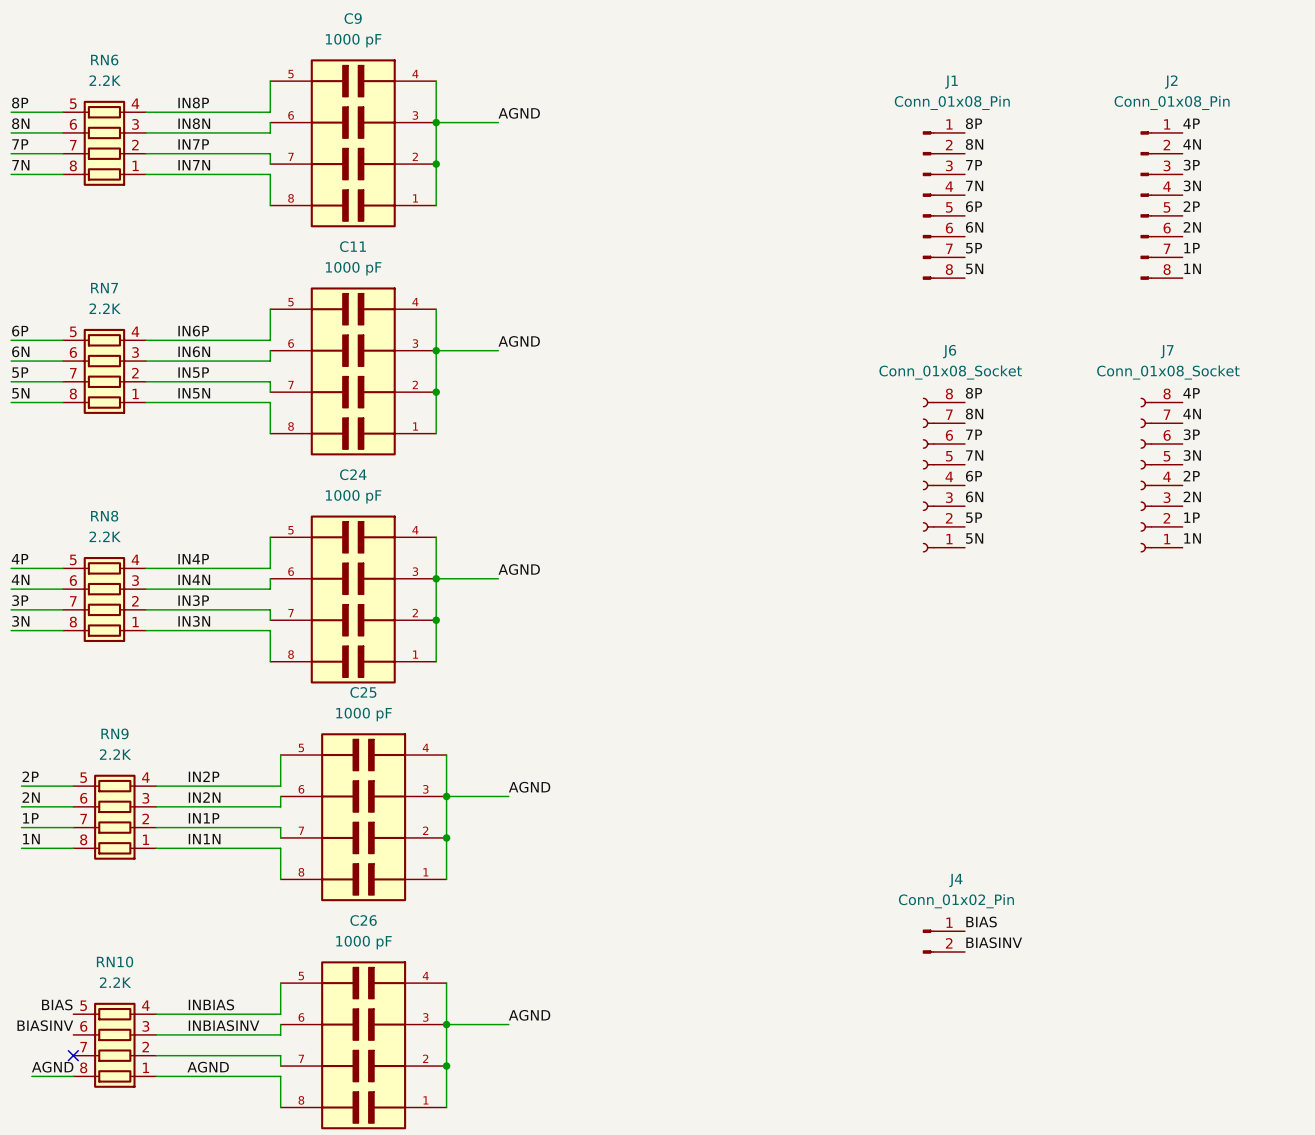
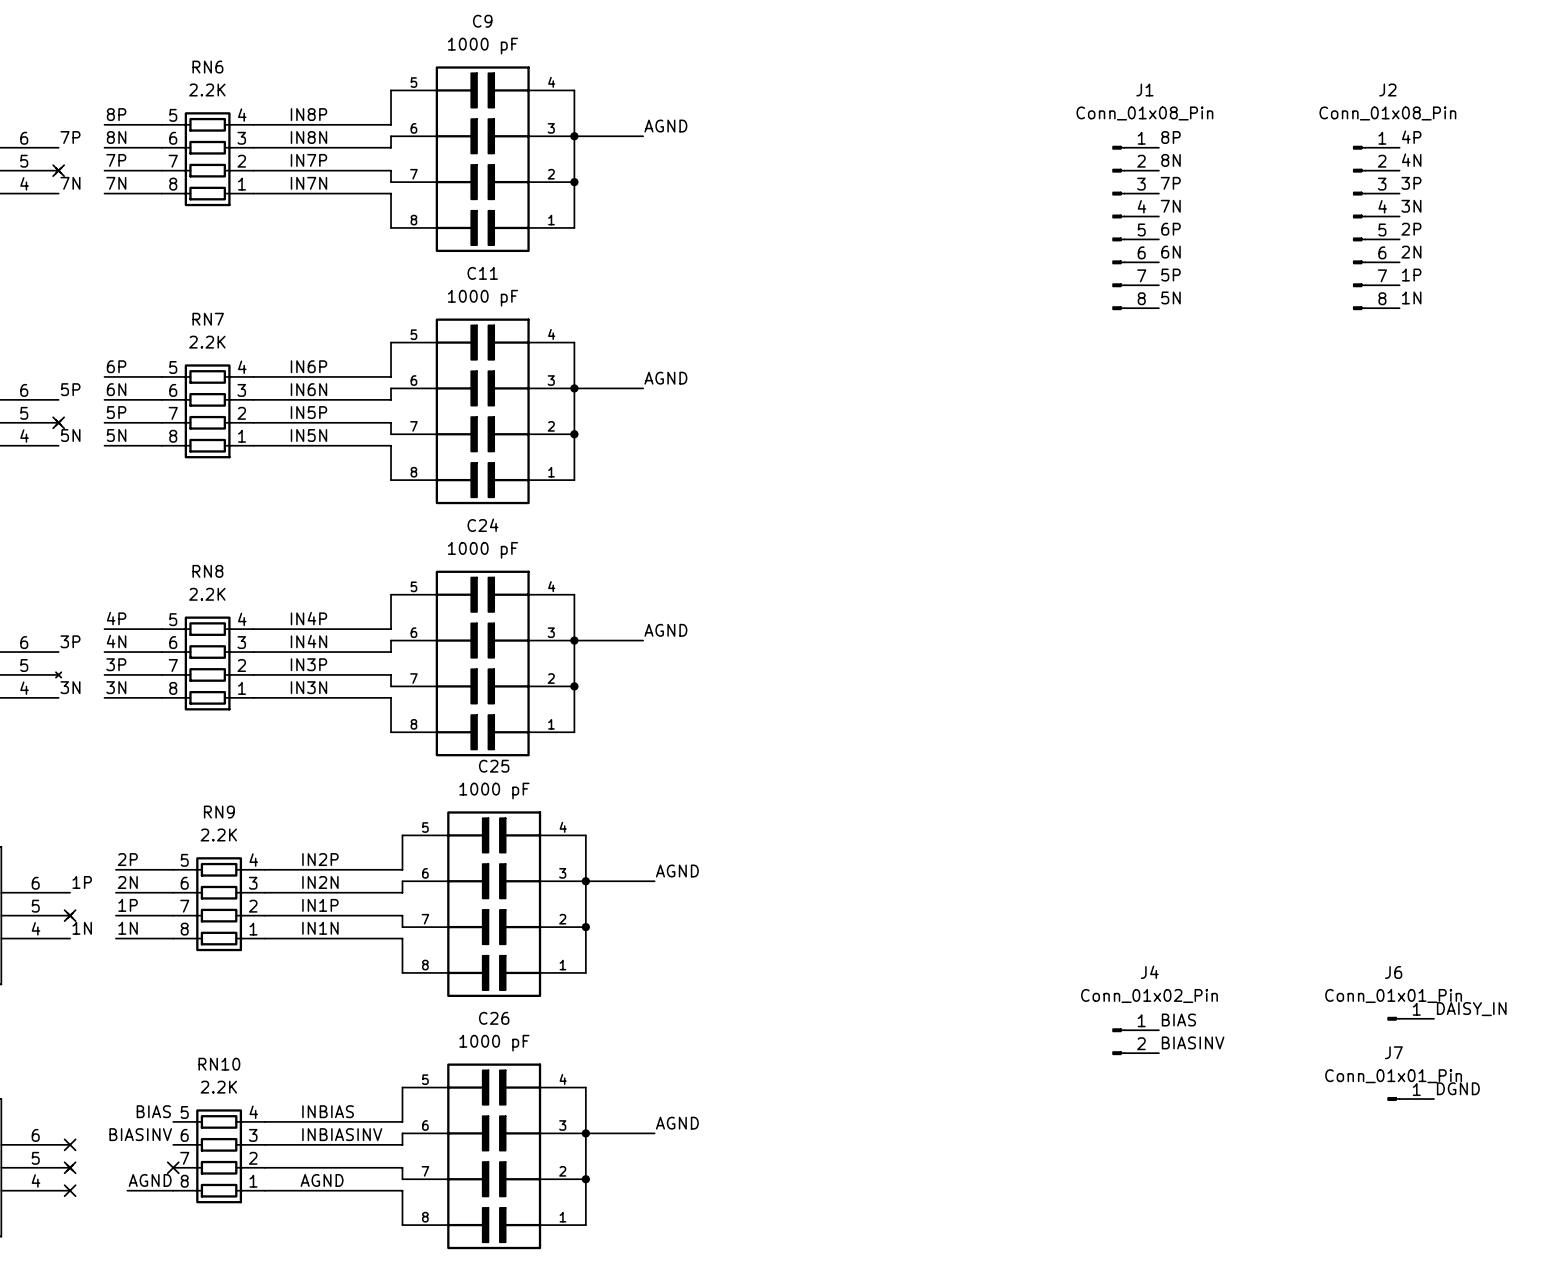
J6 name position: J6 (949, 351) -> J6 (1393, 972)
J7 name position: J7 (1167, 351) -> J7 (1393, 1052)
J6 value: Conn_01x08_Socket (950, 372) -> Conn_01x01_Pin (1393, 995)
J7 value: Conn_01x08_Socket (1168, 372) -> Conn_01x01_Pin (1393, 1076)
label: 8P (973, 393) -> none
label: 4P (1191, 393) -> none
J6 symbol: [922, 397, 965, 553] -> [1387, 1016, 1434, 1021]
J7 symbol: [1140, 397, 1183, 553] -> [1387, 1097, 1434, 1101]
label: 8N (974, 414) -> none
label: 4N (1192, 414) -> none
label: 7P (974, 434) -> none
label: 3P (1191, 434) -> none
label: 7N (974, 455) -> none
label: 3N (1192, 455) -> none
label: 6P (974, 476) -> none
label: 2P (1191, 476) -> none
label: 6N (974, 496) -> none
label: 2N (1192, 496) -> none
label: 5P (974, 517) -> none
label: 1P (1192, 517) -> none
label: 5N (974, 538) -> none
label: 1N (1192, 538) -> none
label: none -> DAISY_IN (1471, 1009)
label: none -> DGND (1458, 1088)

